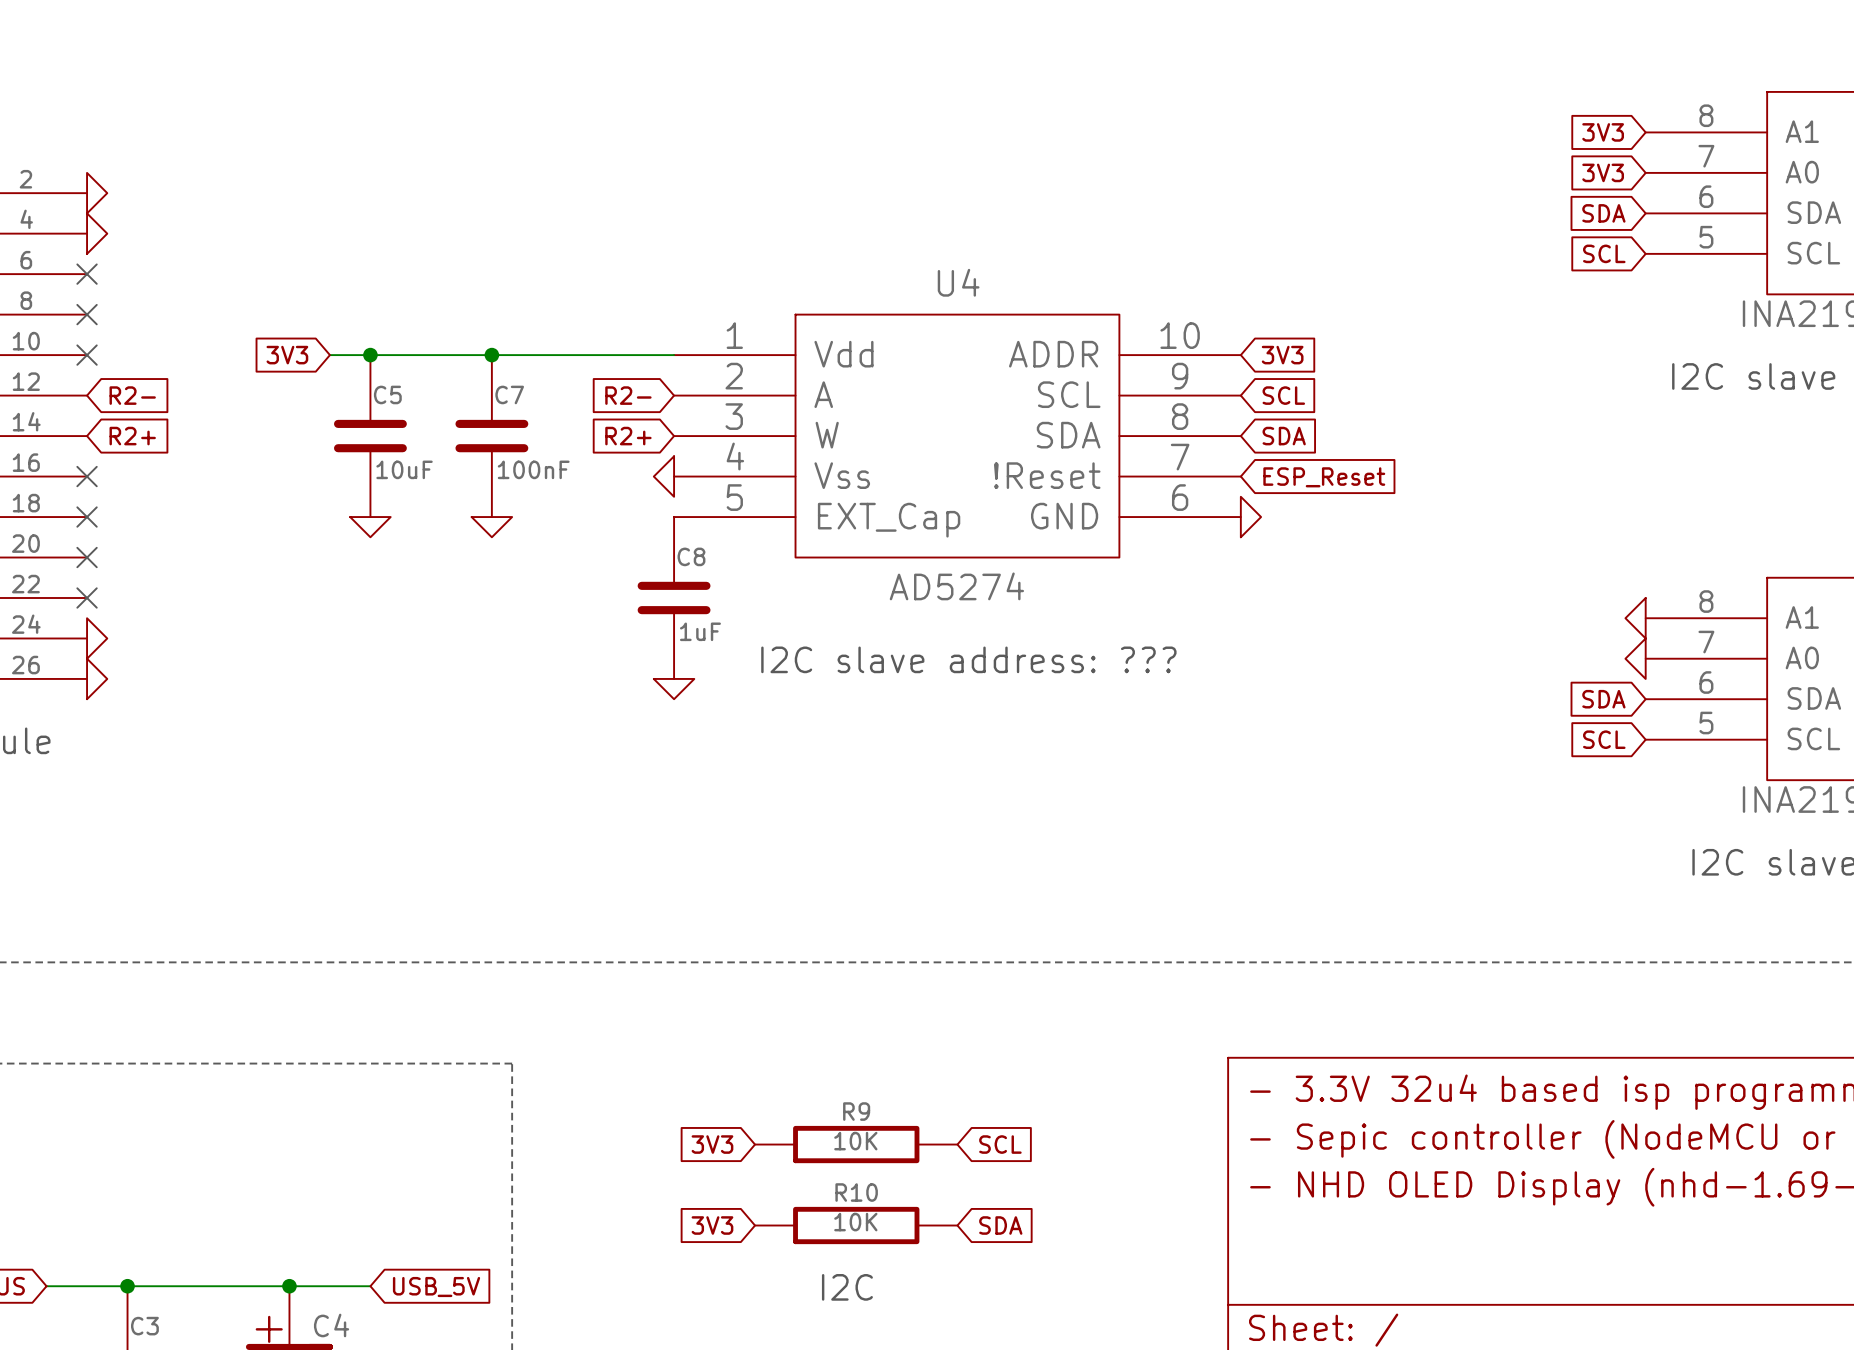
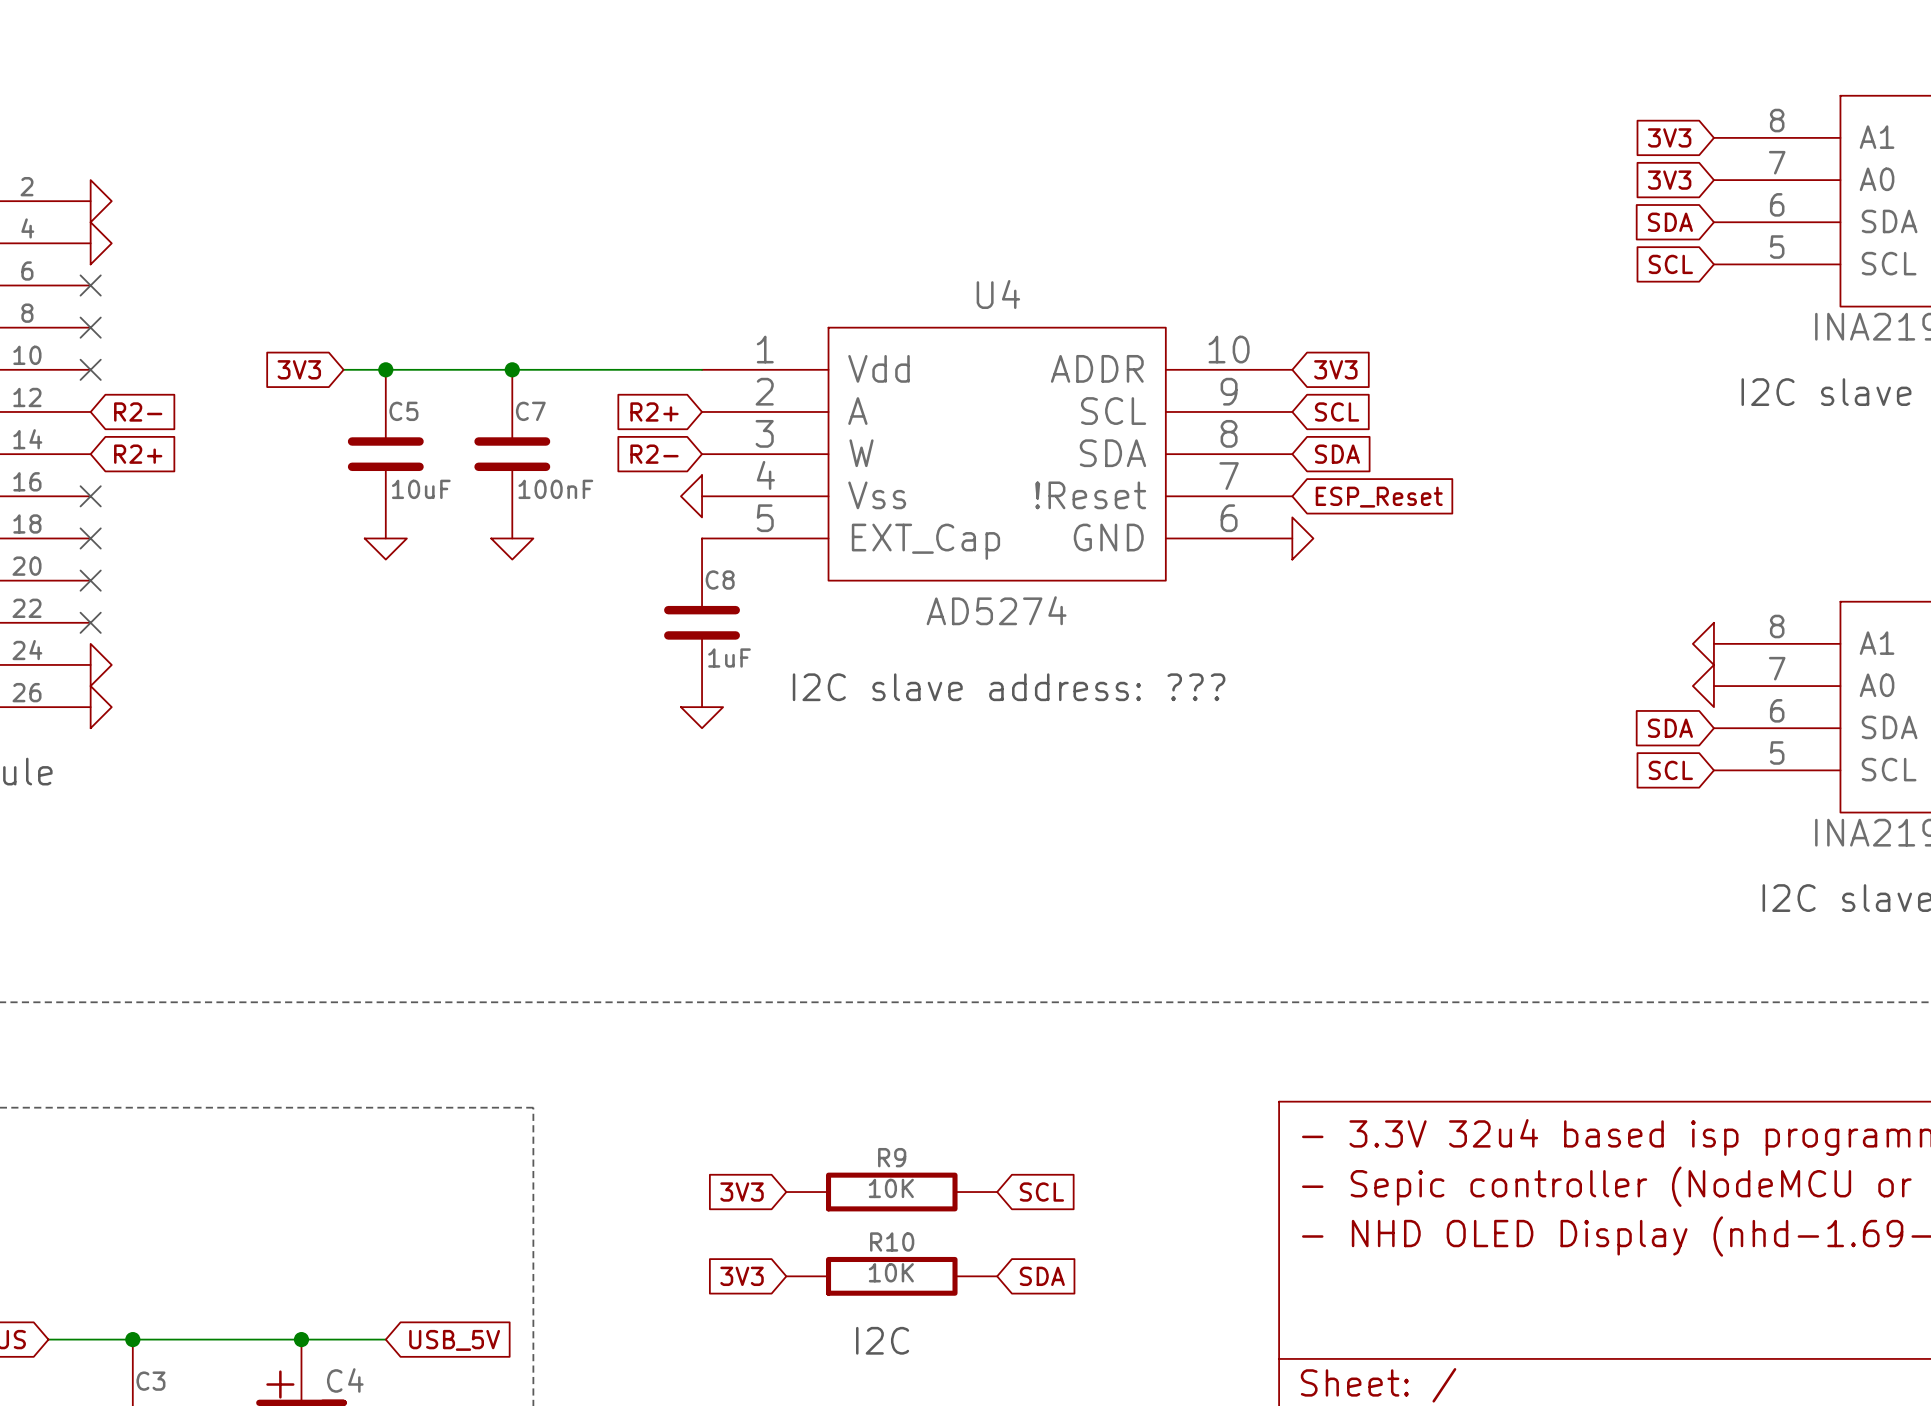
global label: R2- (628, 395) -> R2+ (654, 411)
global label: R2+ (628, 436) -> R2- (654, 454)

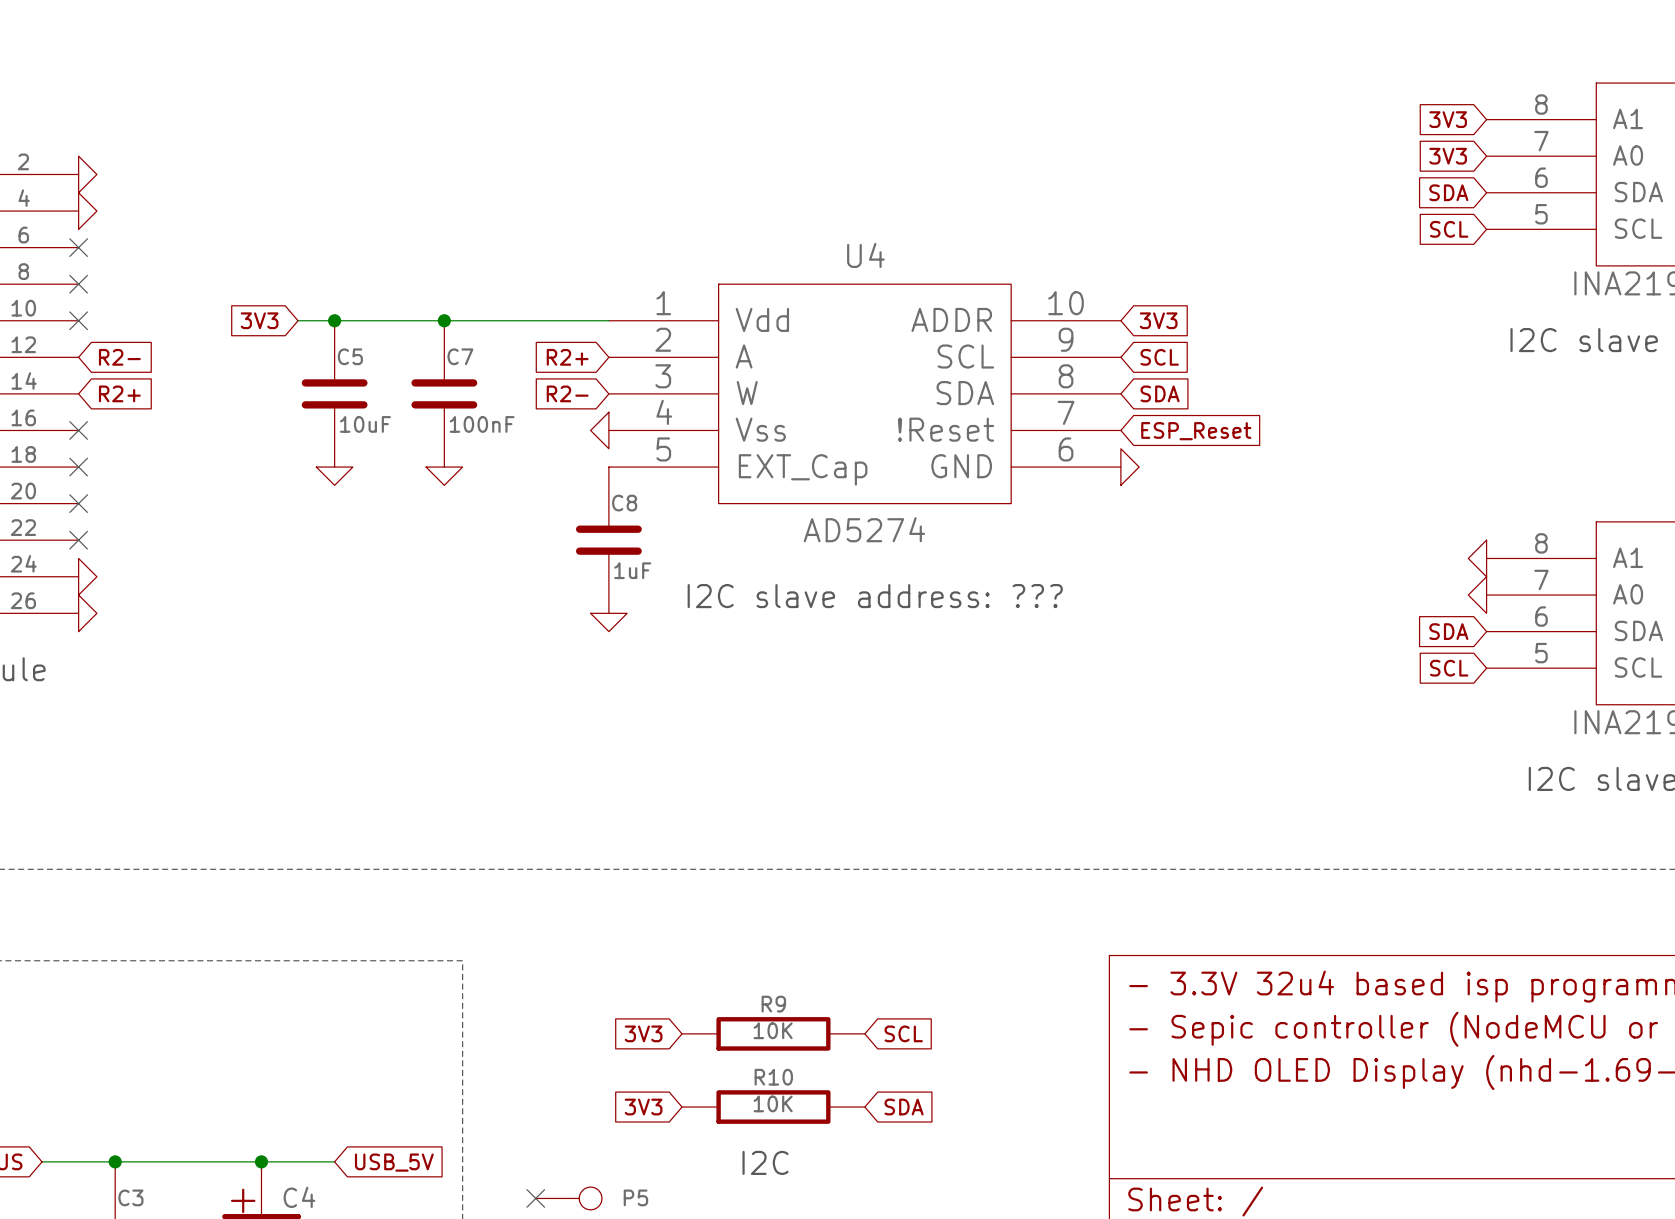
no-connect mark: none -> (535, 1198)
P5: none -> (568, 1198)

